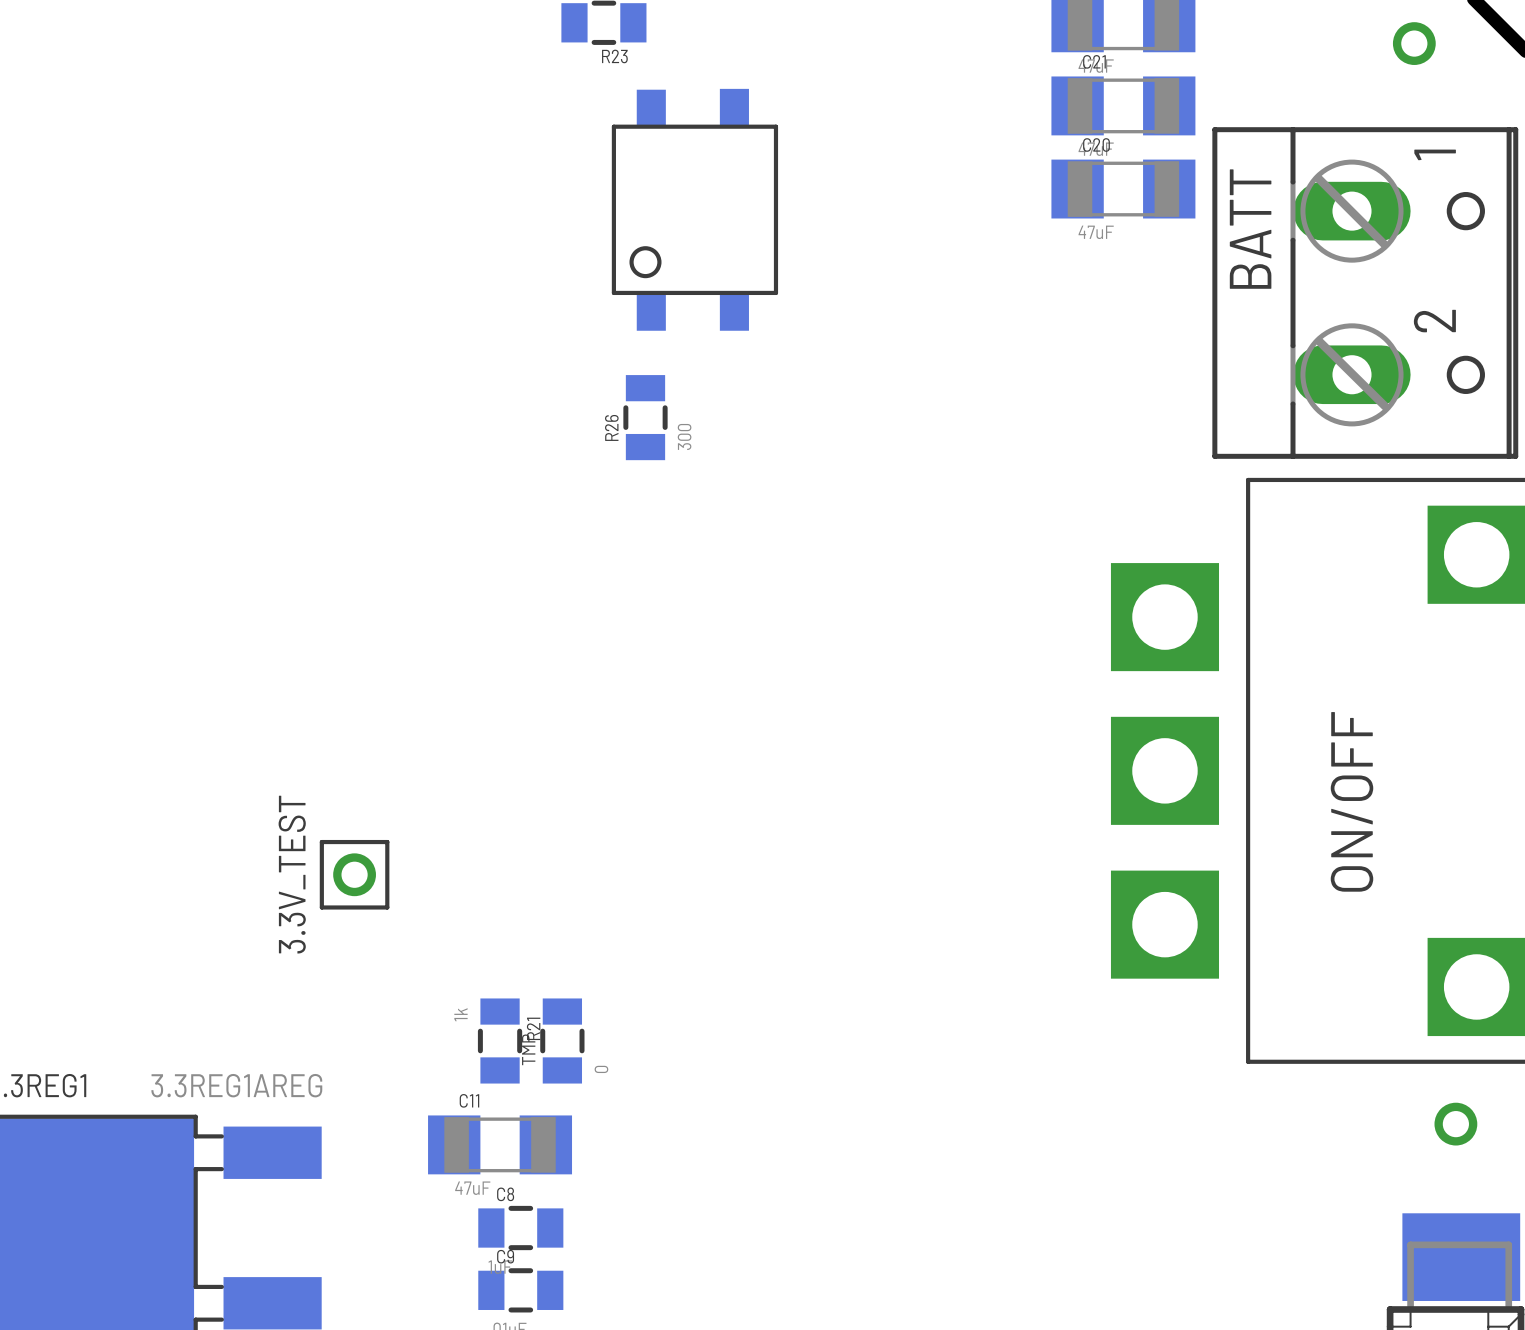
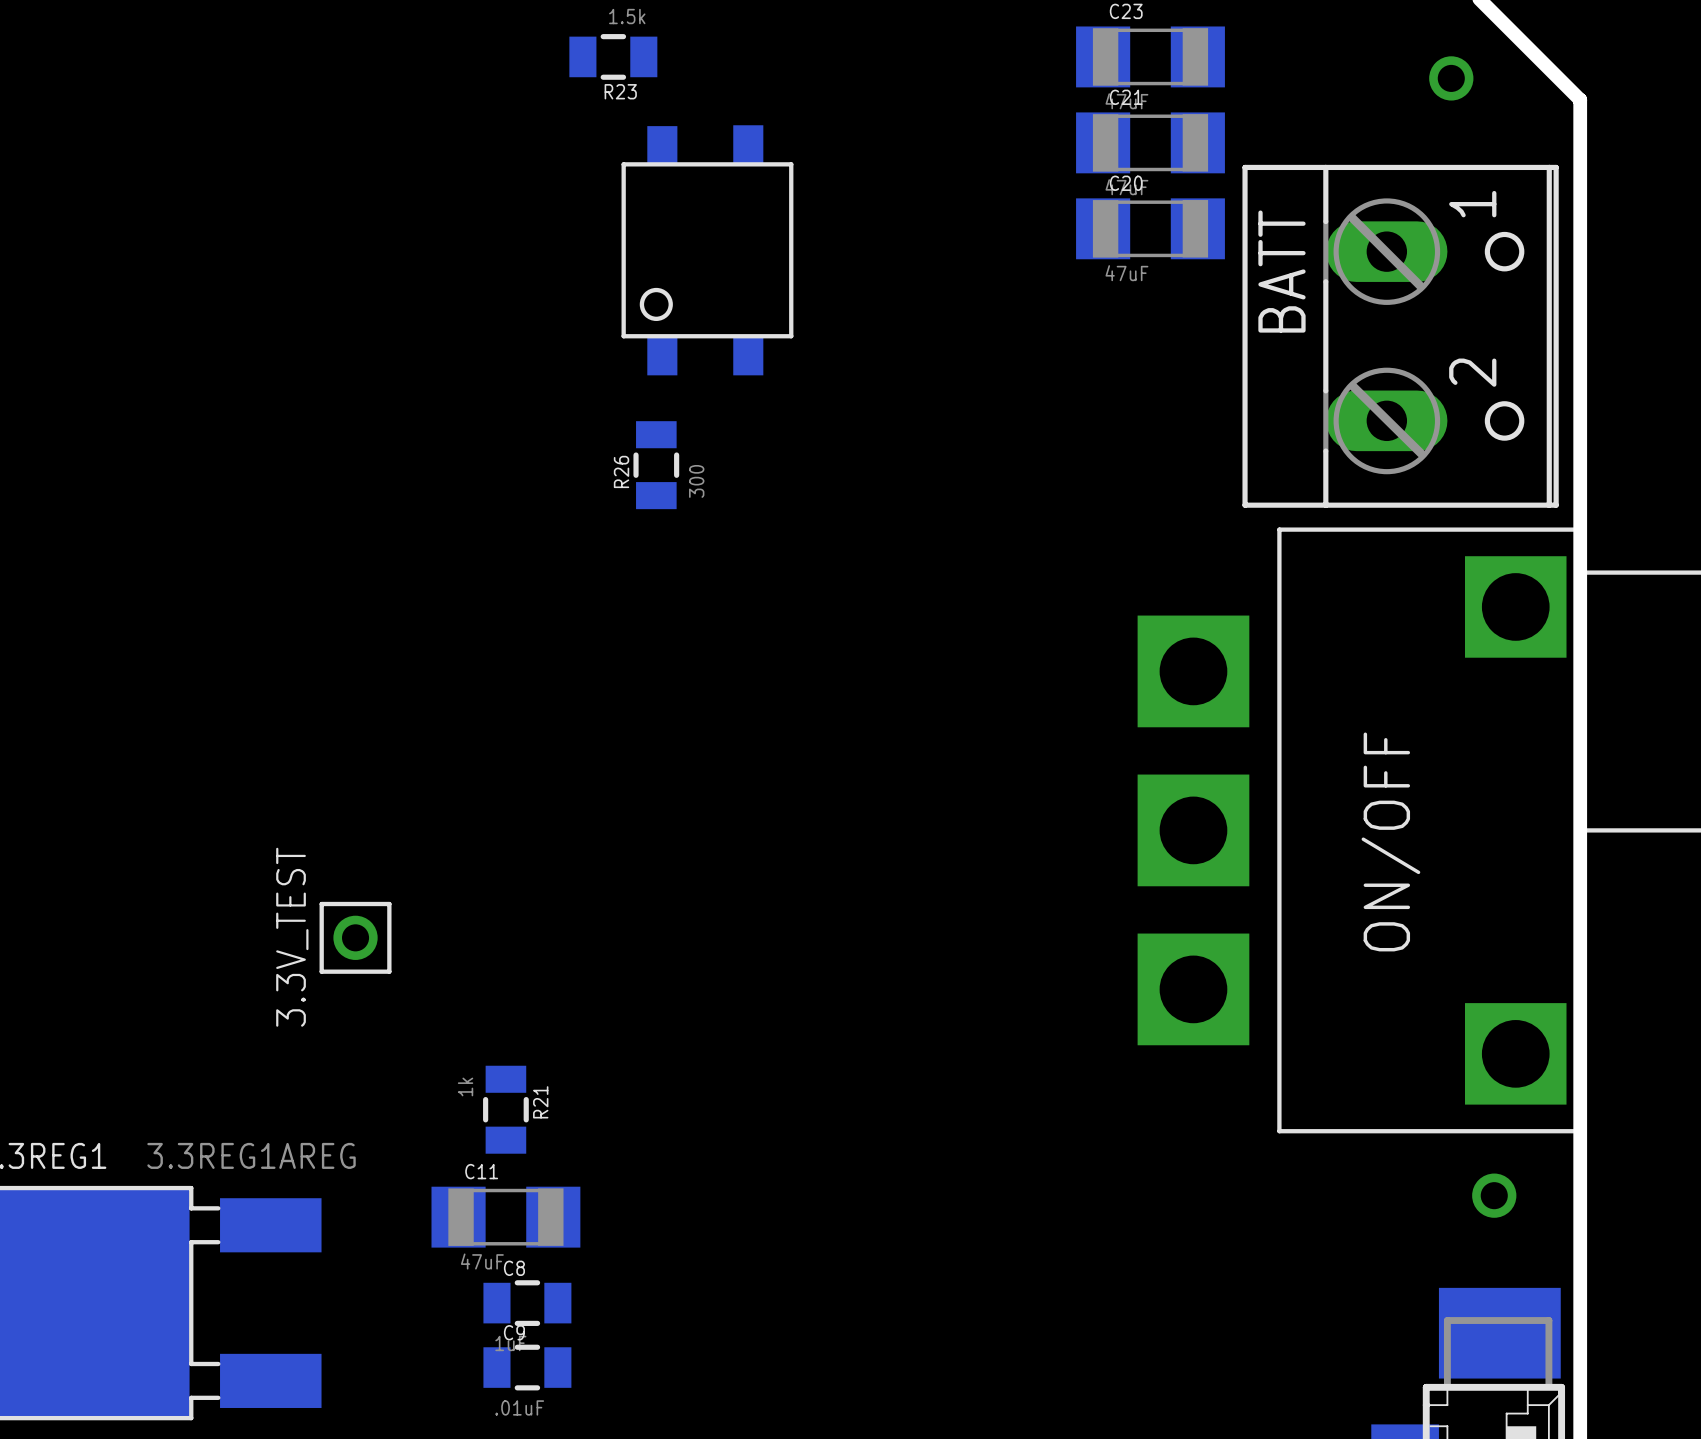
TMP: 0 (562, 1041) -> none

